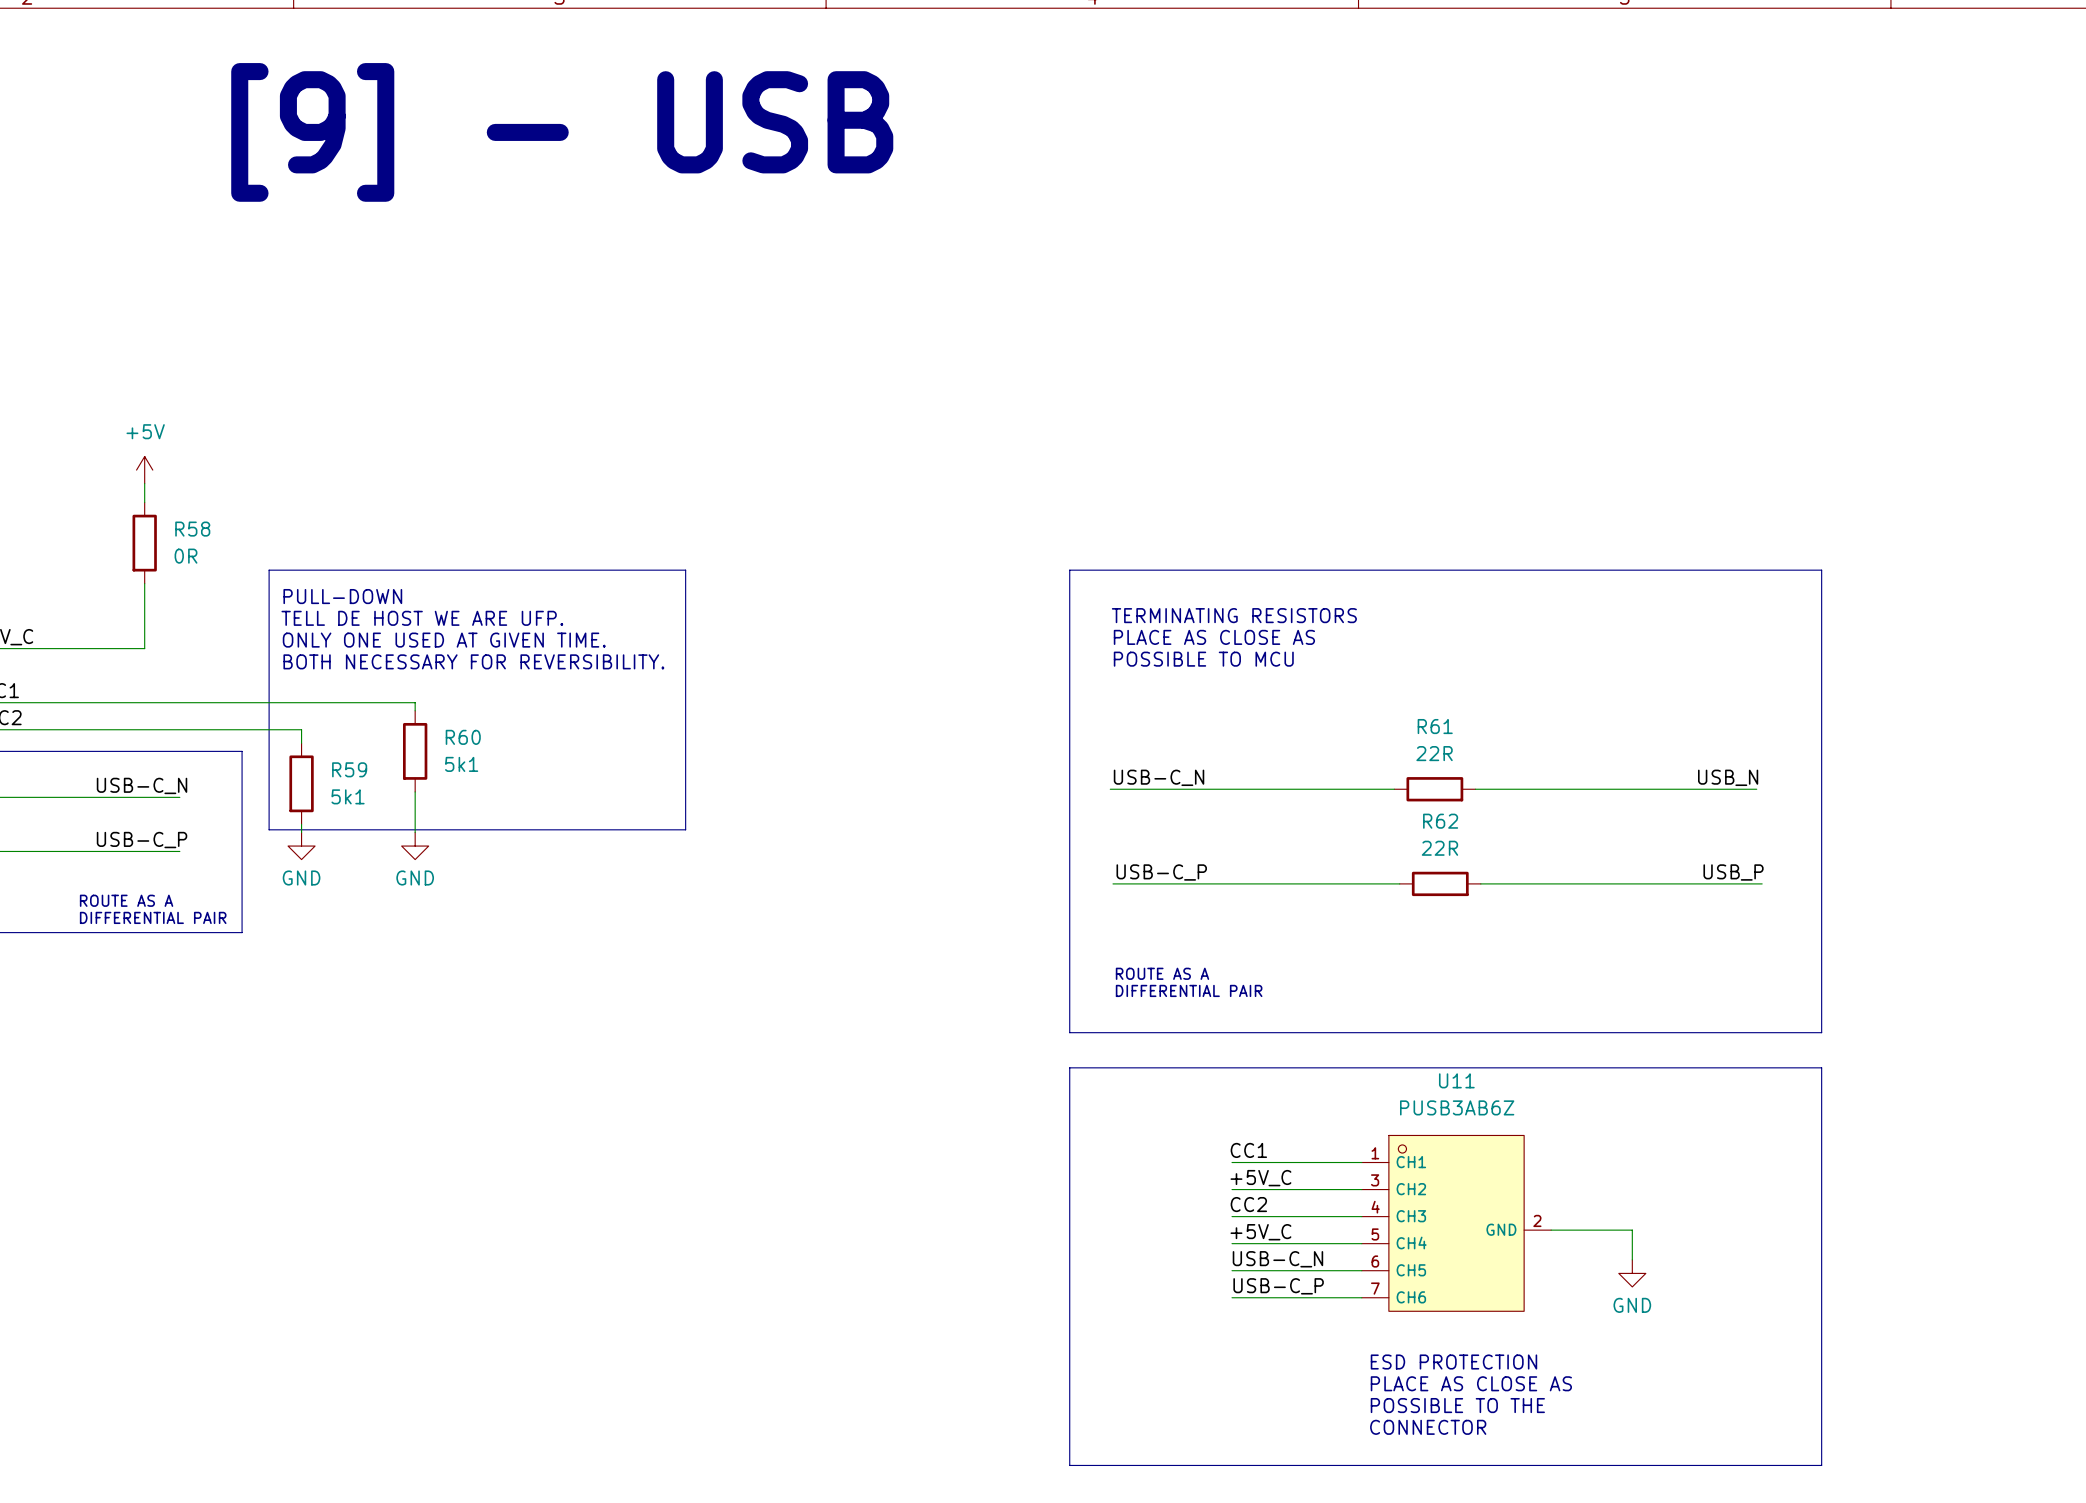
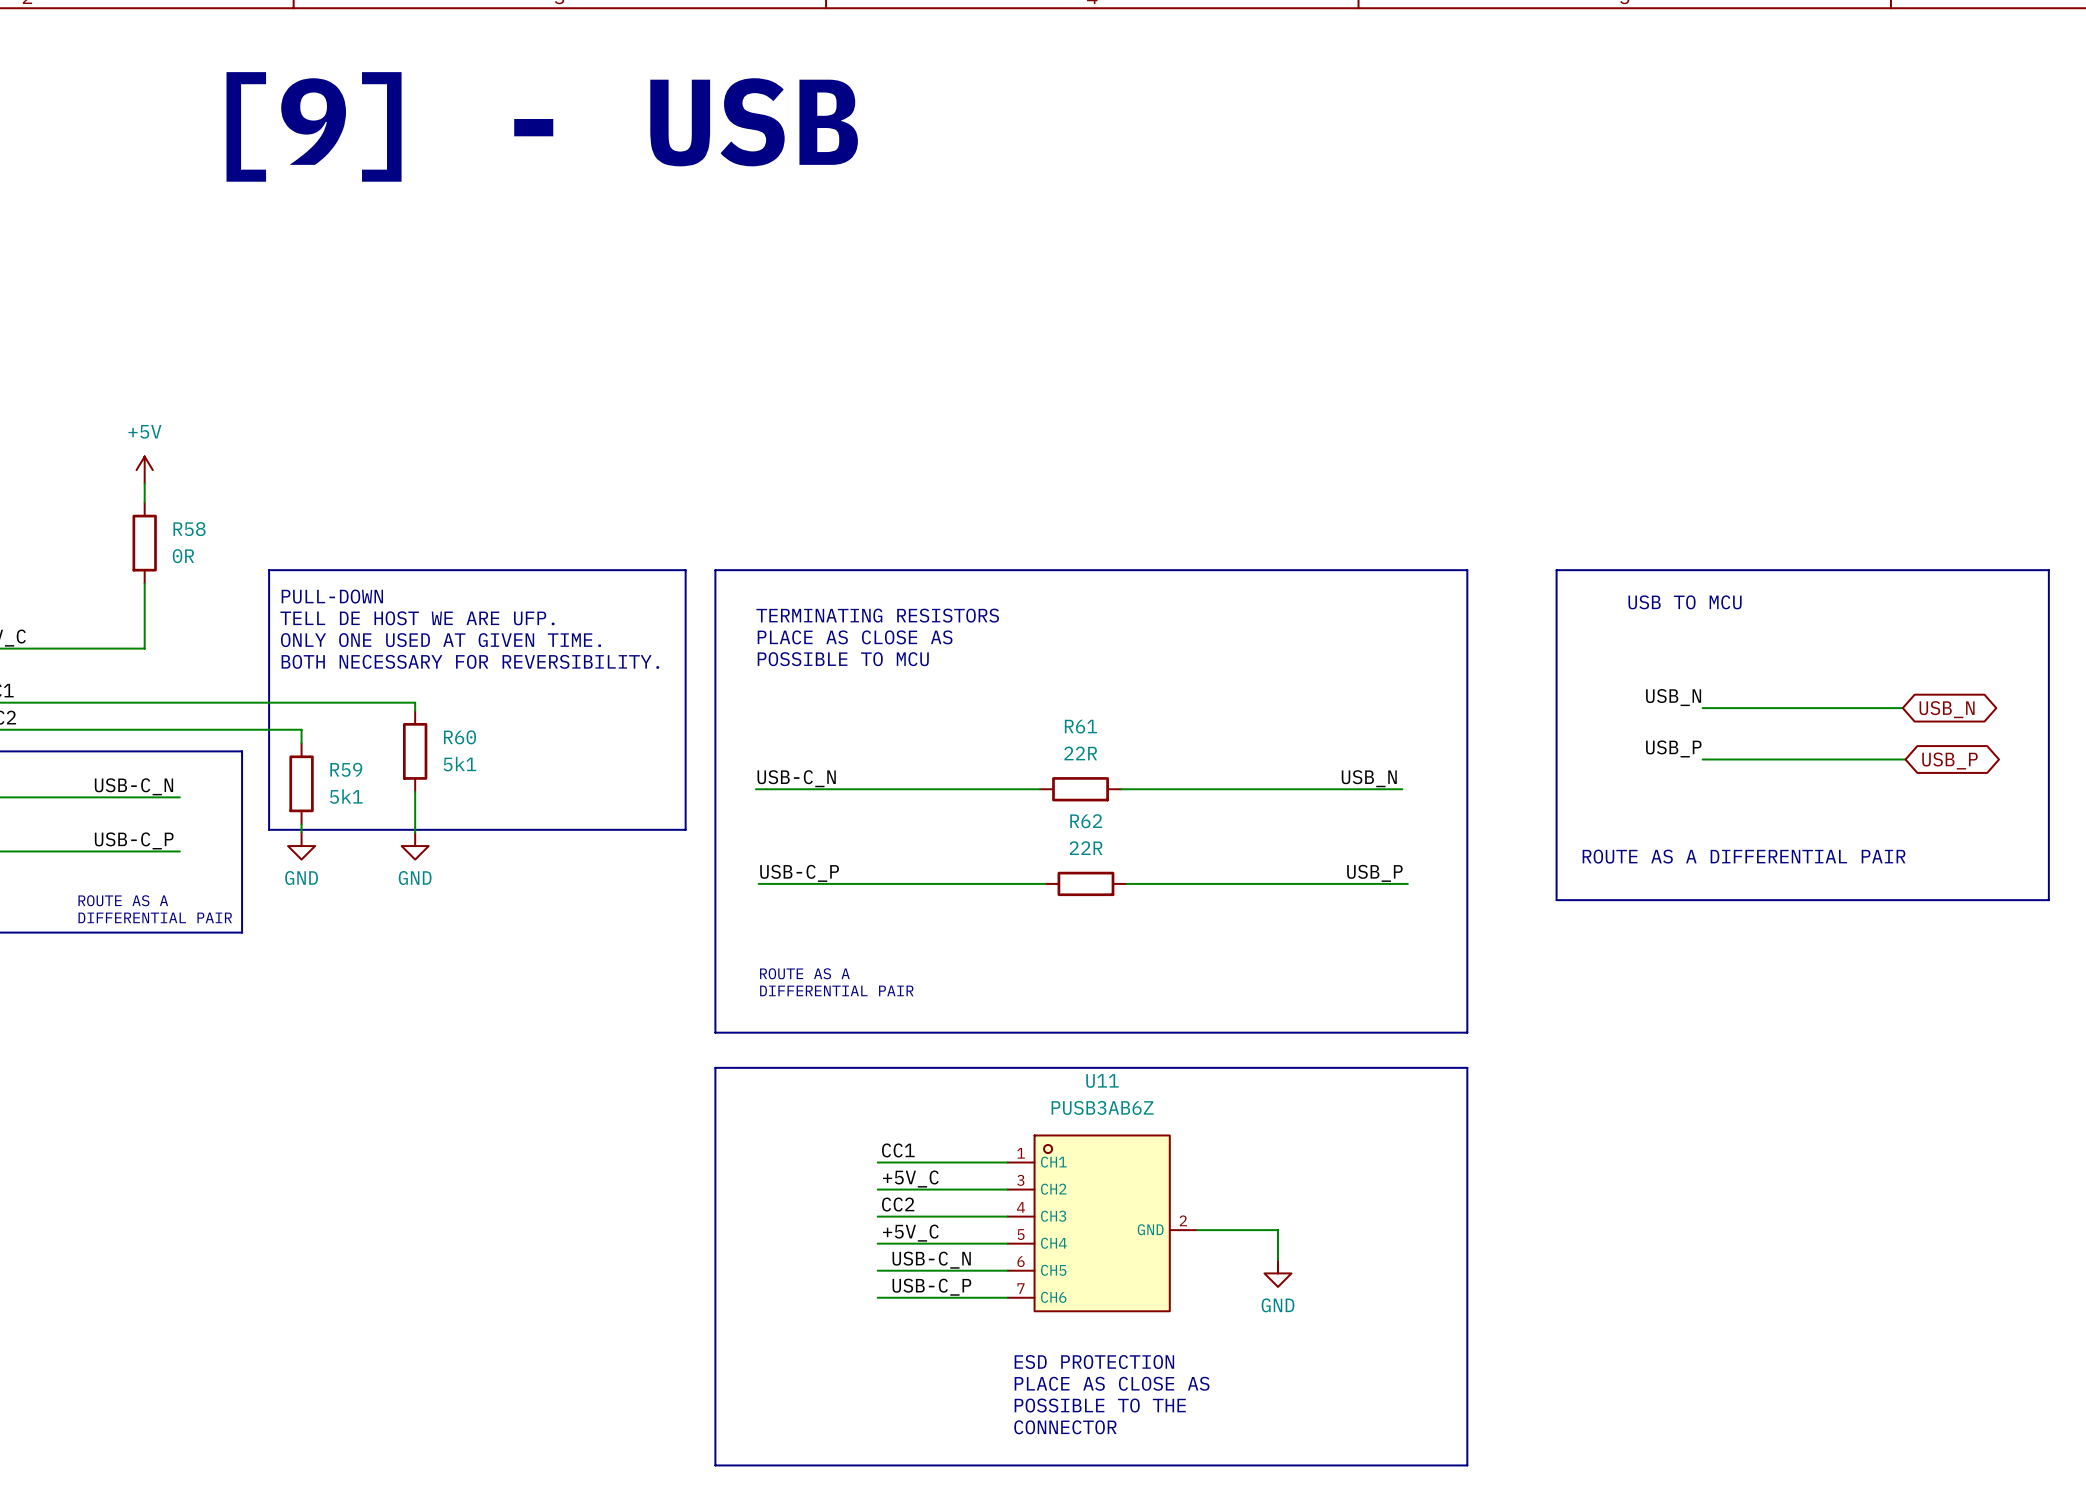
line: (1069, 570) (1069, 1032) -> (1069, 570) (715, 570) (715, 1032) (1069, 1032)
line: (1467, 570) (1556, 570) -> (1821, 570) (2048, 570) (2048, 900) (1556, 900) (1556, 570)
line: (1821, 570) (1821, 1032) (1467, 1032) -> (1467, 570) (1467, 1032)
text: none -> USB TO MCU (1685, 602)
text: none -> TERMINATING RESISTORS (877, 615)
text: TERMINATING RESISTORS (1234, 615) -> none
text: none -> PLACE AS CLOSE AS (855, 637)
text: PLACE AS CLOSE AS (1214, 637) -> none
text: none -> POSSIBLE TO MCU (843, 659)
text: POSSIBLE TO MCU (1203, 659) -> none
wire: none -> (1702, 708) (1902, 708)
global label: none -> USB_N (1947, 709)
wire: none -> (1702, 759) (1905, 759)
global label: none -> USB_P (1950, 761)
label: none -> USB-C_N (796, 778)
label: USB-C_N (1159, 777) -> none
label: none -> USB_N (1369, 778)
label position: USB_N (1728, 777) -> USB_N (1673, 697)
wire: none -> (755, 789) (1039, 789)
R61 position: (1434, 789) -> (1080, 789)
wire: (1475, 789) (1756, 789) -> none
text: none -> ROUTE AS A DIFFERENTIAL PAIR (1744, 856)
label: none -> USB-C_P (799, 873)
label: USB-C_P (1161, 872) -> none
label: none -> USB_P (1374, 873)
label position: USB_P (1733, 872) -> USB_P (1673, 748)
wire: none -> (758, 883) (1045, 883)
R62 position: (1440, 883) -> (1085, 883)
wire: (1480, 883) (1762, 883) -> none
text: none -> ROUTE AS A (804, 973)
text: ROUTE AS A (1162, 973) -> none
text: none -> DIFFERENTIAL PAIR (836, 990)
text: DIFFERENTIAL PAIR (1189, 990) -> none
line: (1069, 1067) (1069, 1465) -> (1069, 1067) (715, 1067) (715, 1465) (1069, 1465)
line: (1467, 1067) (1821, 1067) (1821, 1465) (1467, 1465) -> (1467, 1067) (1467, 1465)
label: none -> CC1 (898, 1150)
label: CC1 (1248, 1150) -> none
wire: none -> (877, 1162) (1007, 1162)
wire: (1232, 1162) (1361, 1162) -> none
label: none -> +5V_C (910, 1179)
label: +5V_C (1260, 1178) -> none
wire: none -> (877, 1189) (1007, 1189)
wire: (1232, 1189) (1361, 1189) -> none
label: none -> CC2 (898, 1204)
label: CC2 (1248, 1204) -> none
wire: none -> (877, 1216) (1007, 1216)
wire: (1232, 1216) (1361, 1216) -> none
U11 position: (1456, 1223) -> (1102, 1223)
wire: none -> (1196, 1230) (1277, 1230) (1277, 1259)
wire: (1551, 1230) (1632, 1230) (1632, 1259) -> none
label: none -> +5V_C (910, 1233)
label: +5V_C (1260, 1232) -> none
wire: none -> (877, 1243) (1007, 1243)
wire: (1232, 1243) (1361, 1243) -> none
label: none -> USB-C_N (931, 1260)
label: USB-C_N (1277, 1259) -> none
wire: none -> (877, 1270) (1007, 1270)
wire: (1232, 1270) (1361, 1270) -> none
power symbol: none -> GND (1277, 1273)
power symbol: GND (1632, 1273) -> none
label: none -> USB-C_P (931, 1287)
label: USB-C_P (1278, 1286) -> none
wire: none -> (877, 1297) (1007, 1297)
wire: (1232, 1297) (1361, 1297) -> none
text: none -> ESD PROTECTION (1094, 1362)
text: ESD PROTECTION (1453, 1362) -> none
text: none -> PLACE AS CLOSE AS (1112, 1383)
text: PLACE AS CLOSE AS (1471, 1383) -> none
text: none -> POSSIBLE TO THE (1100, 1405)
text: POSSIBLE TO THE (1457, 1405) -> none
text: none -> CONNECTOR (1065, 1427)
text: CONNECTOR (1428, 1427) -> none

